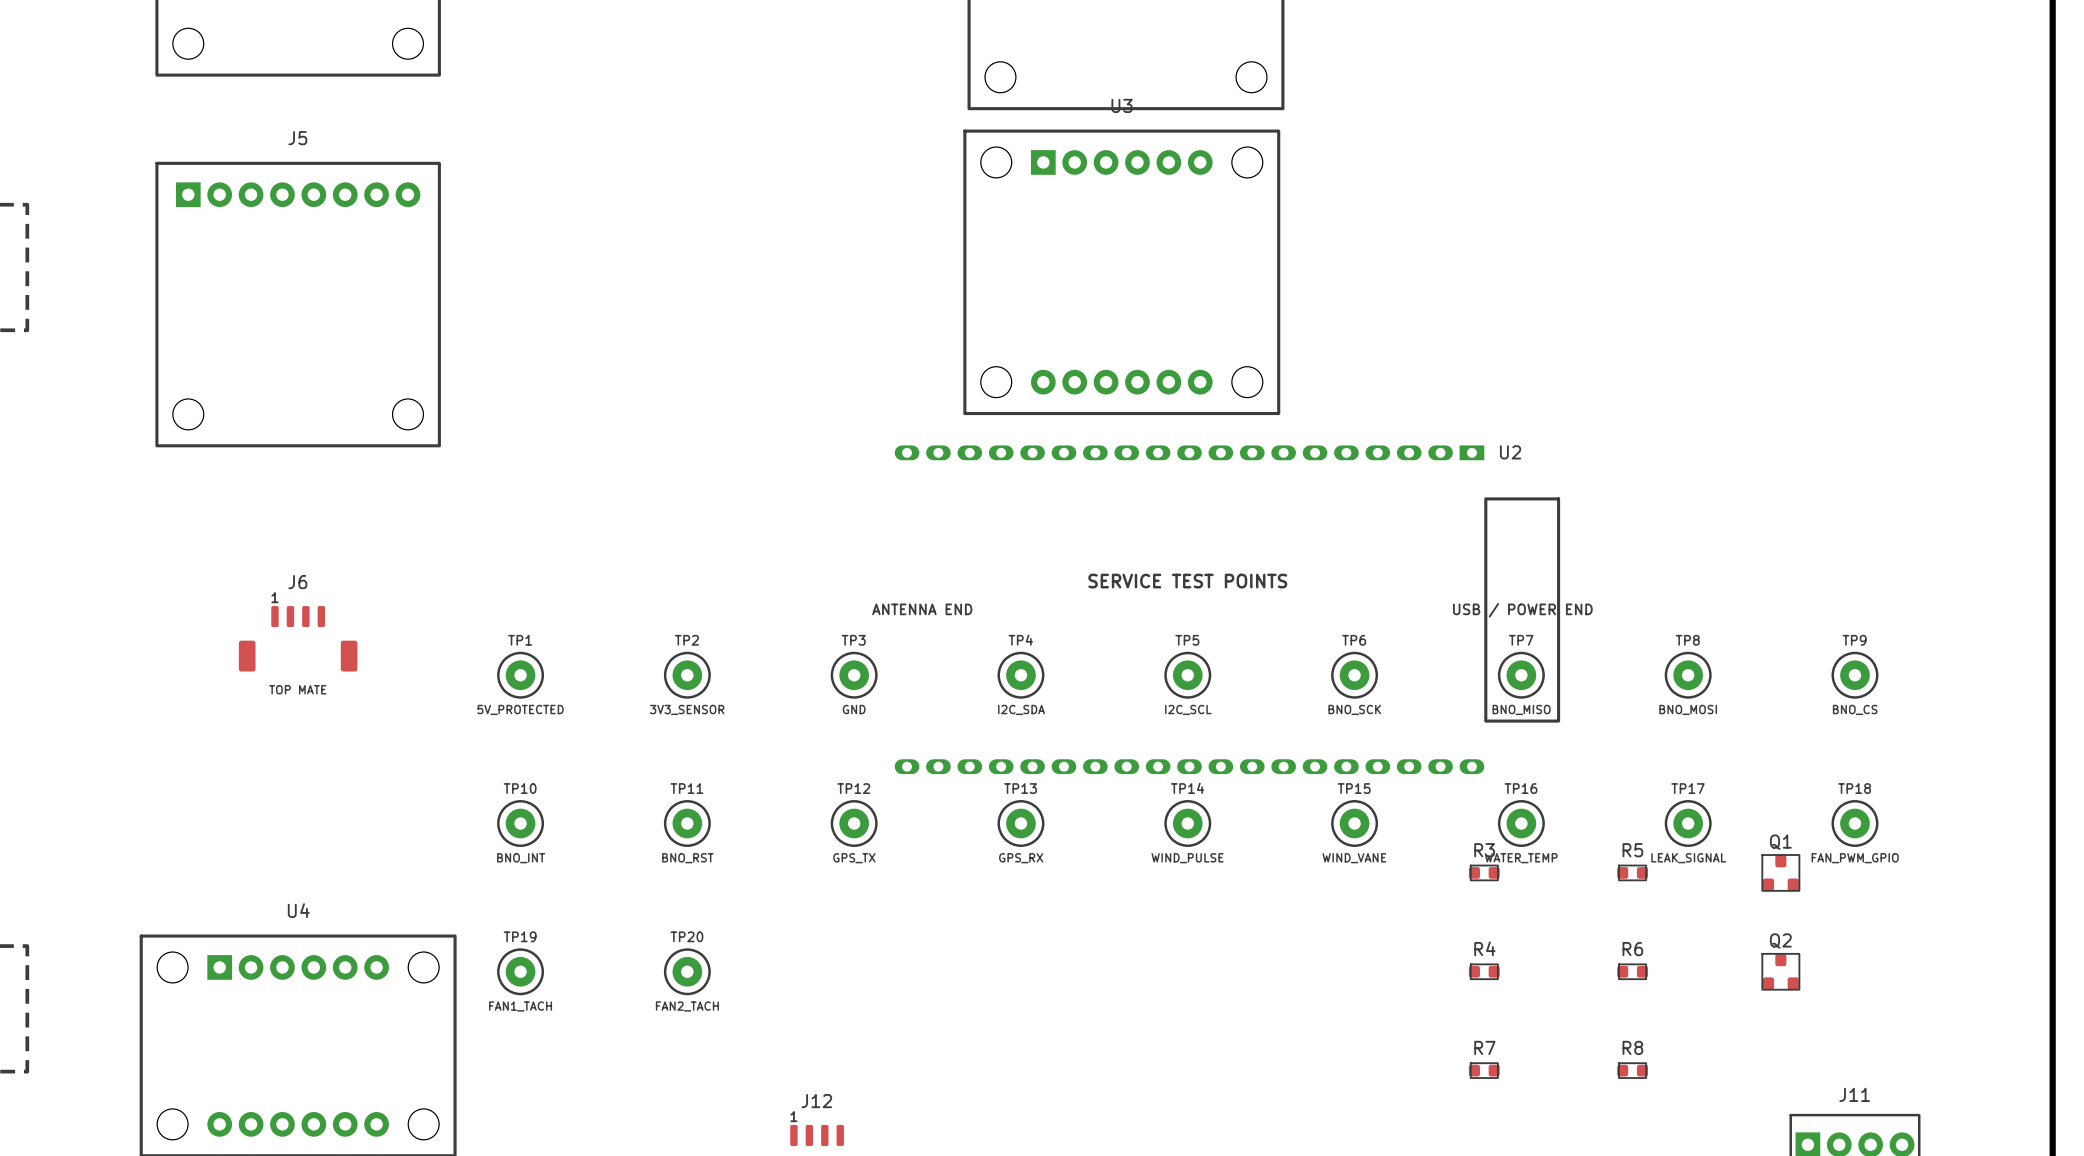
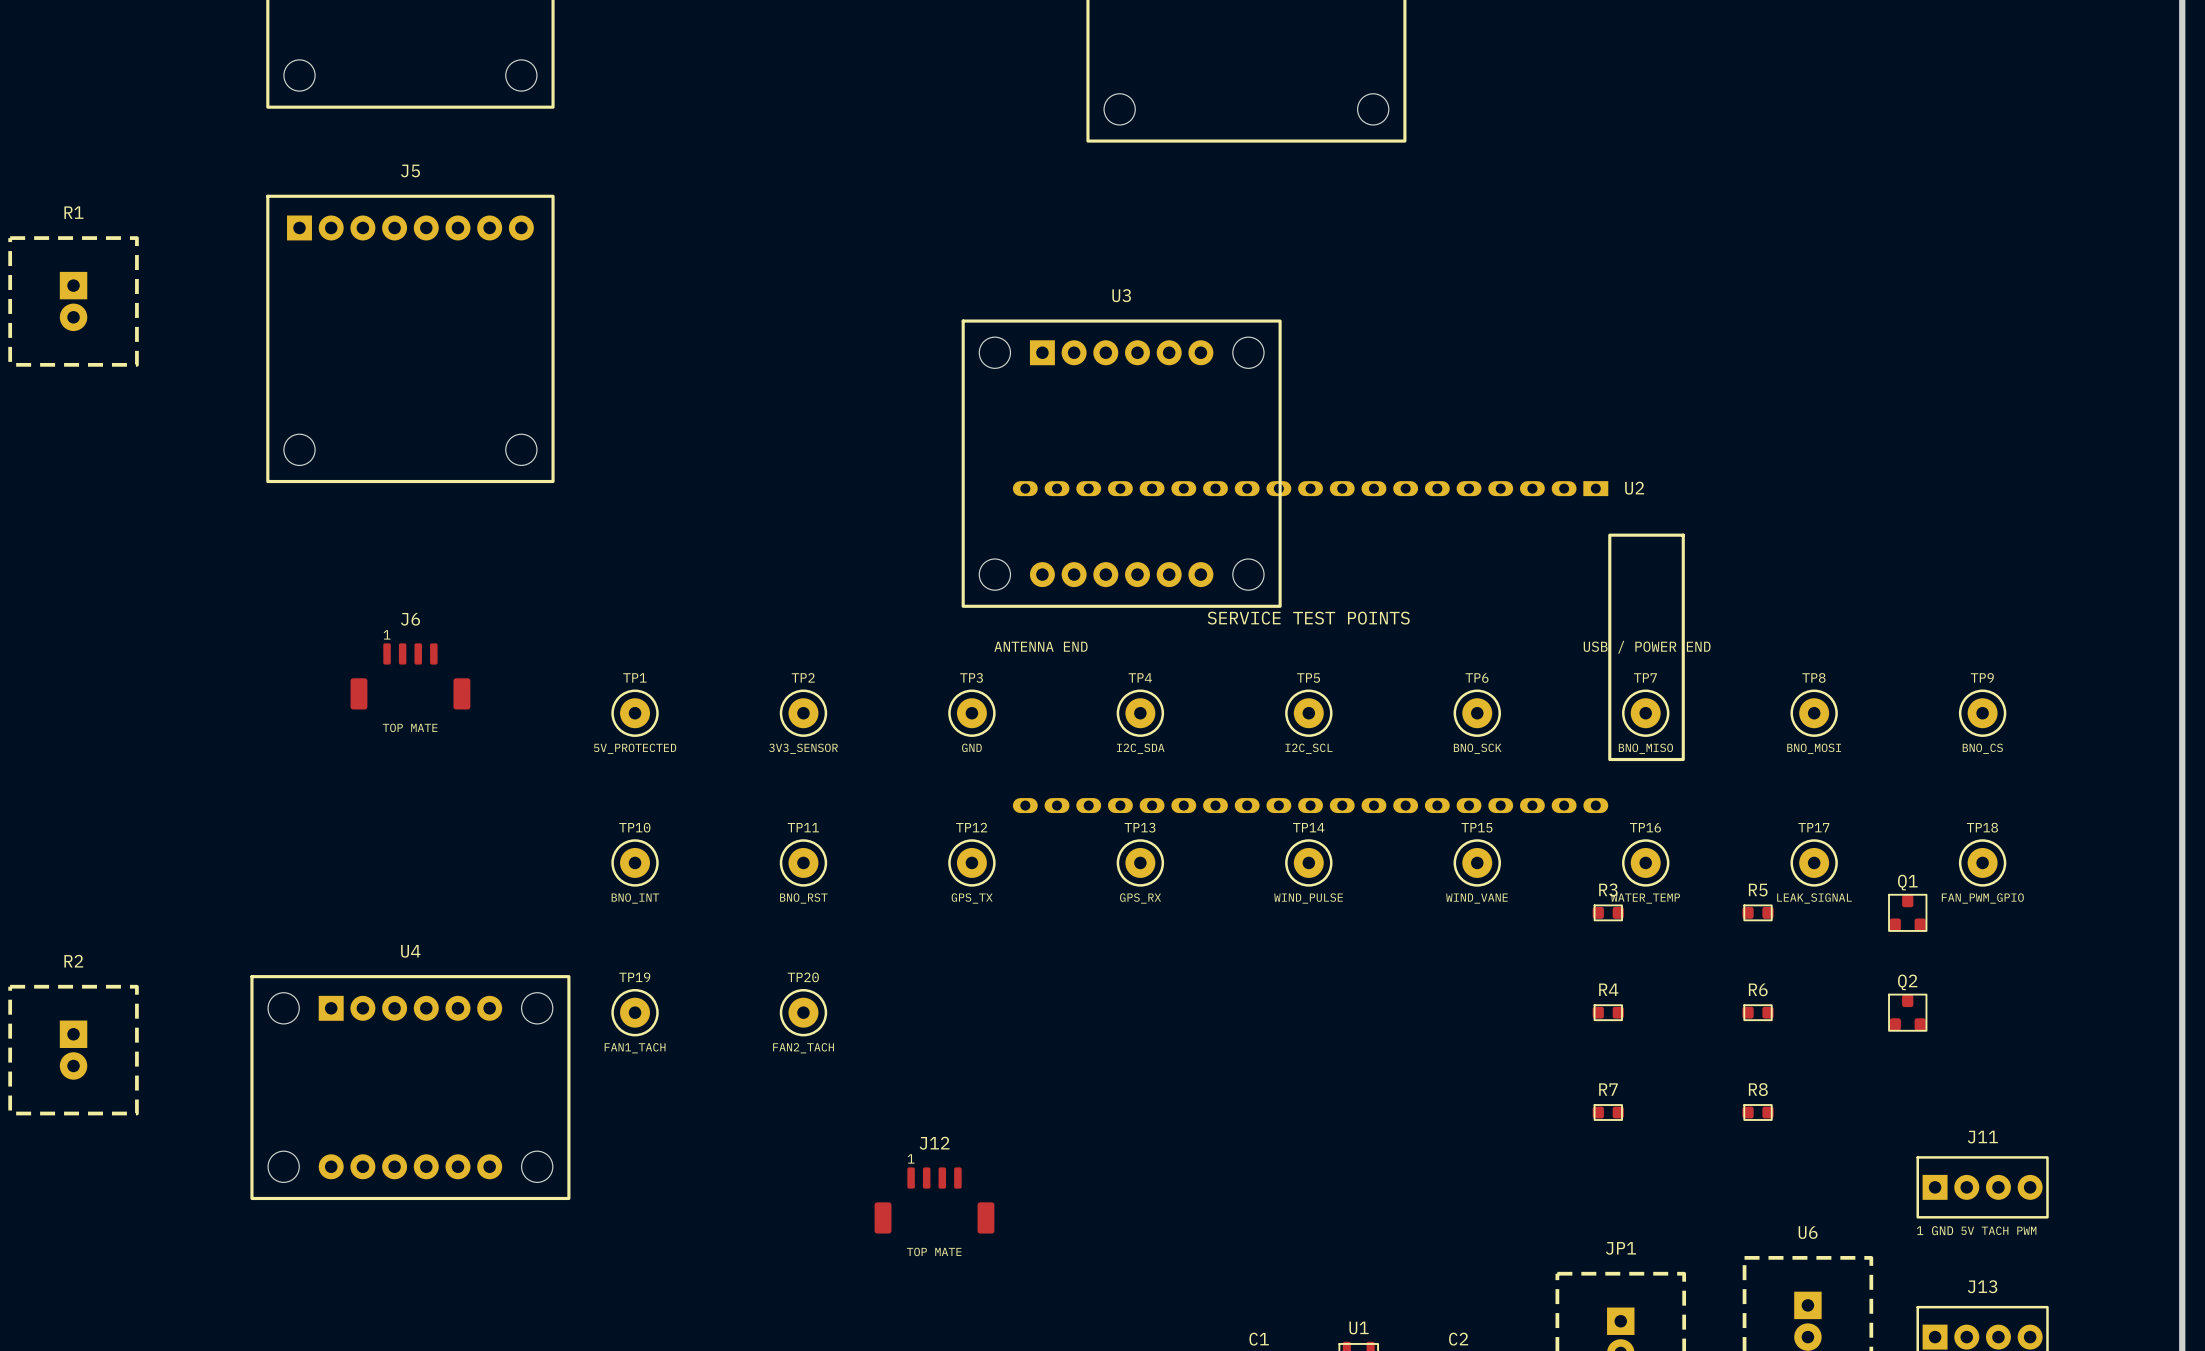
U3 position: (1121, 272) -> (1121, 463)

